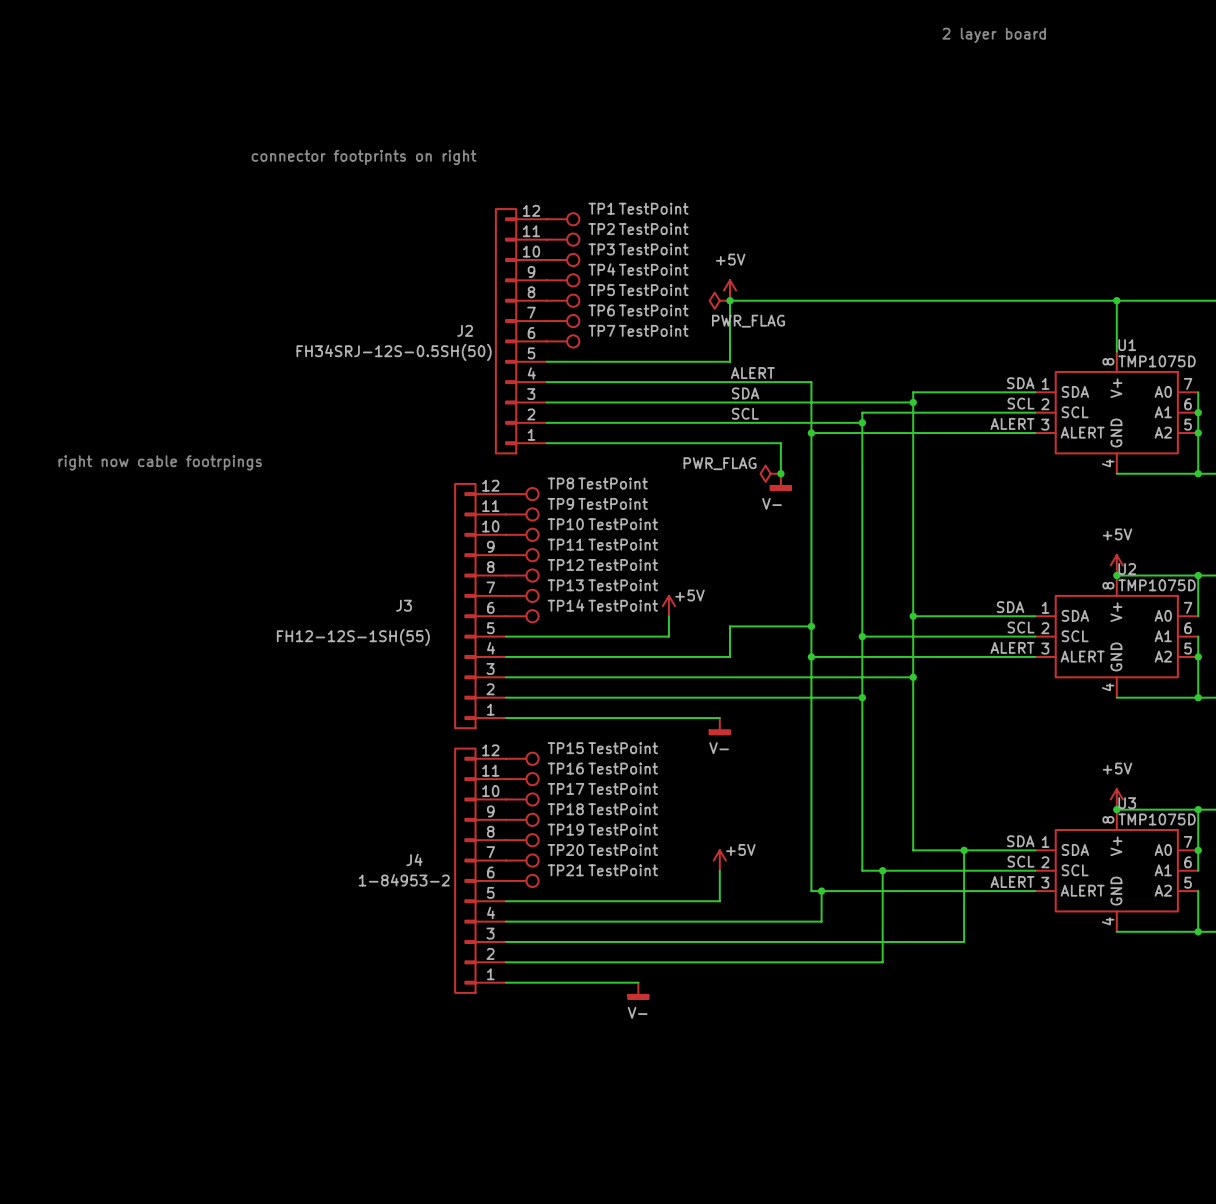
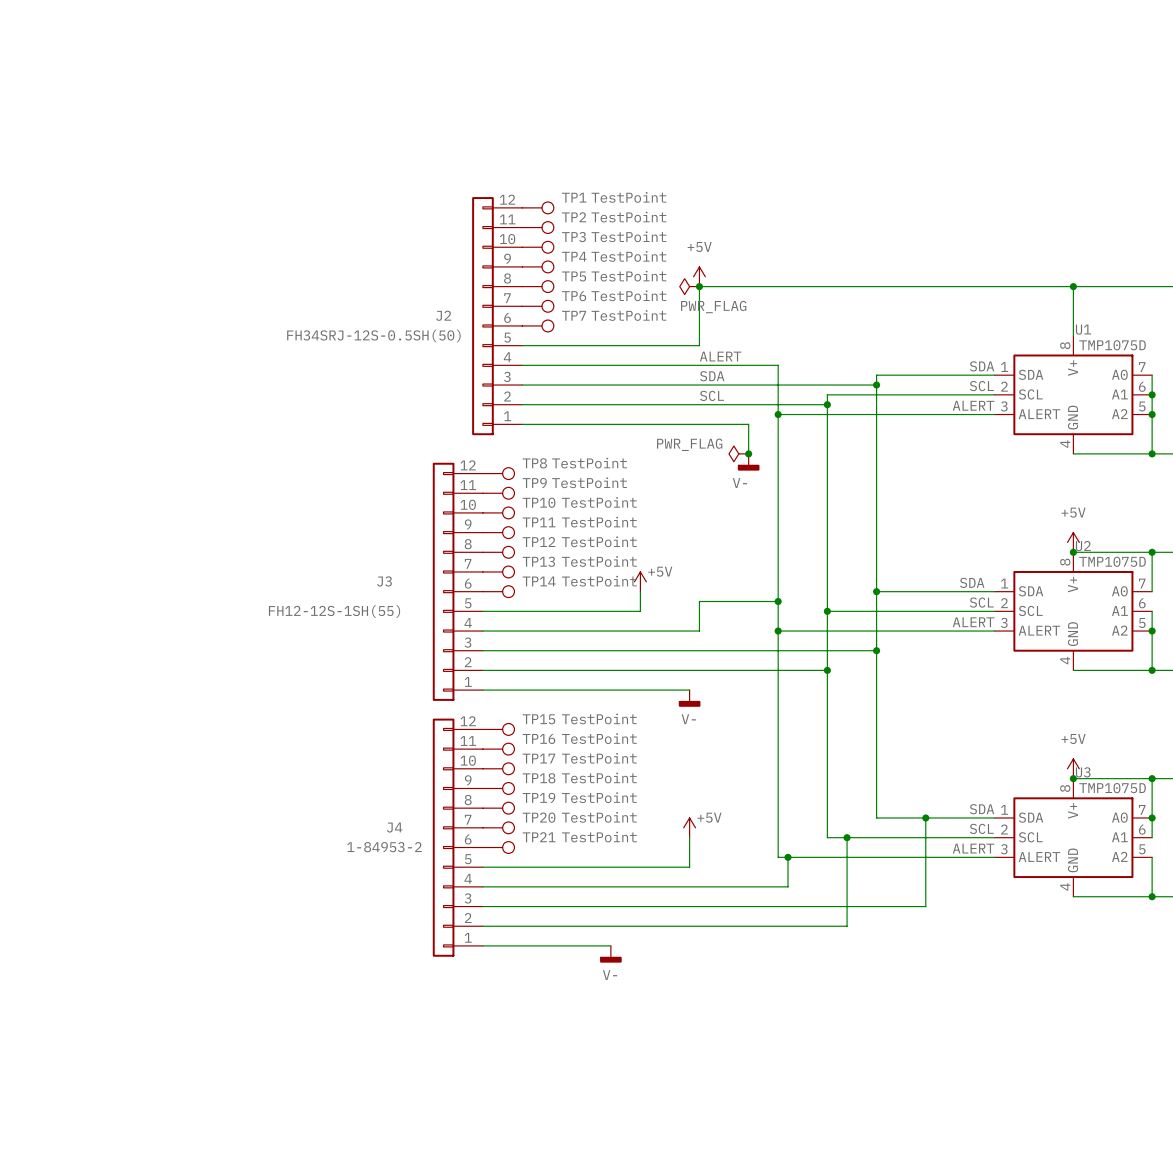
text: 2 layer board (994, 35) -> none
text: connector footprints on right (364, 157) -> none
text: right now cable footrpings (160, 462) -> none

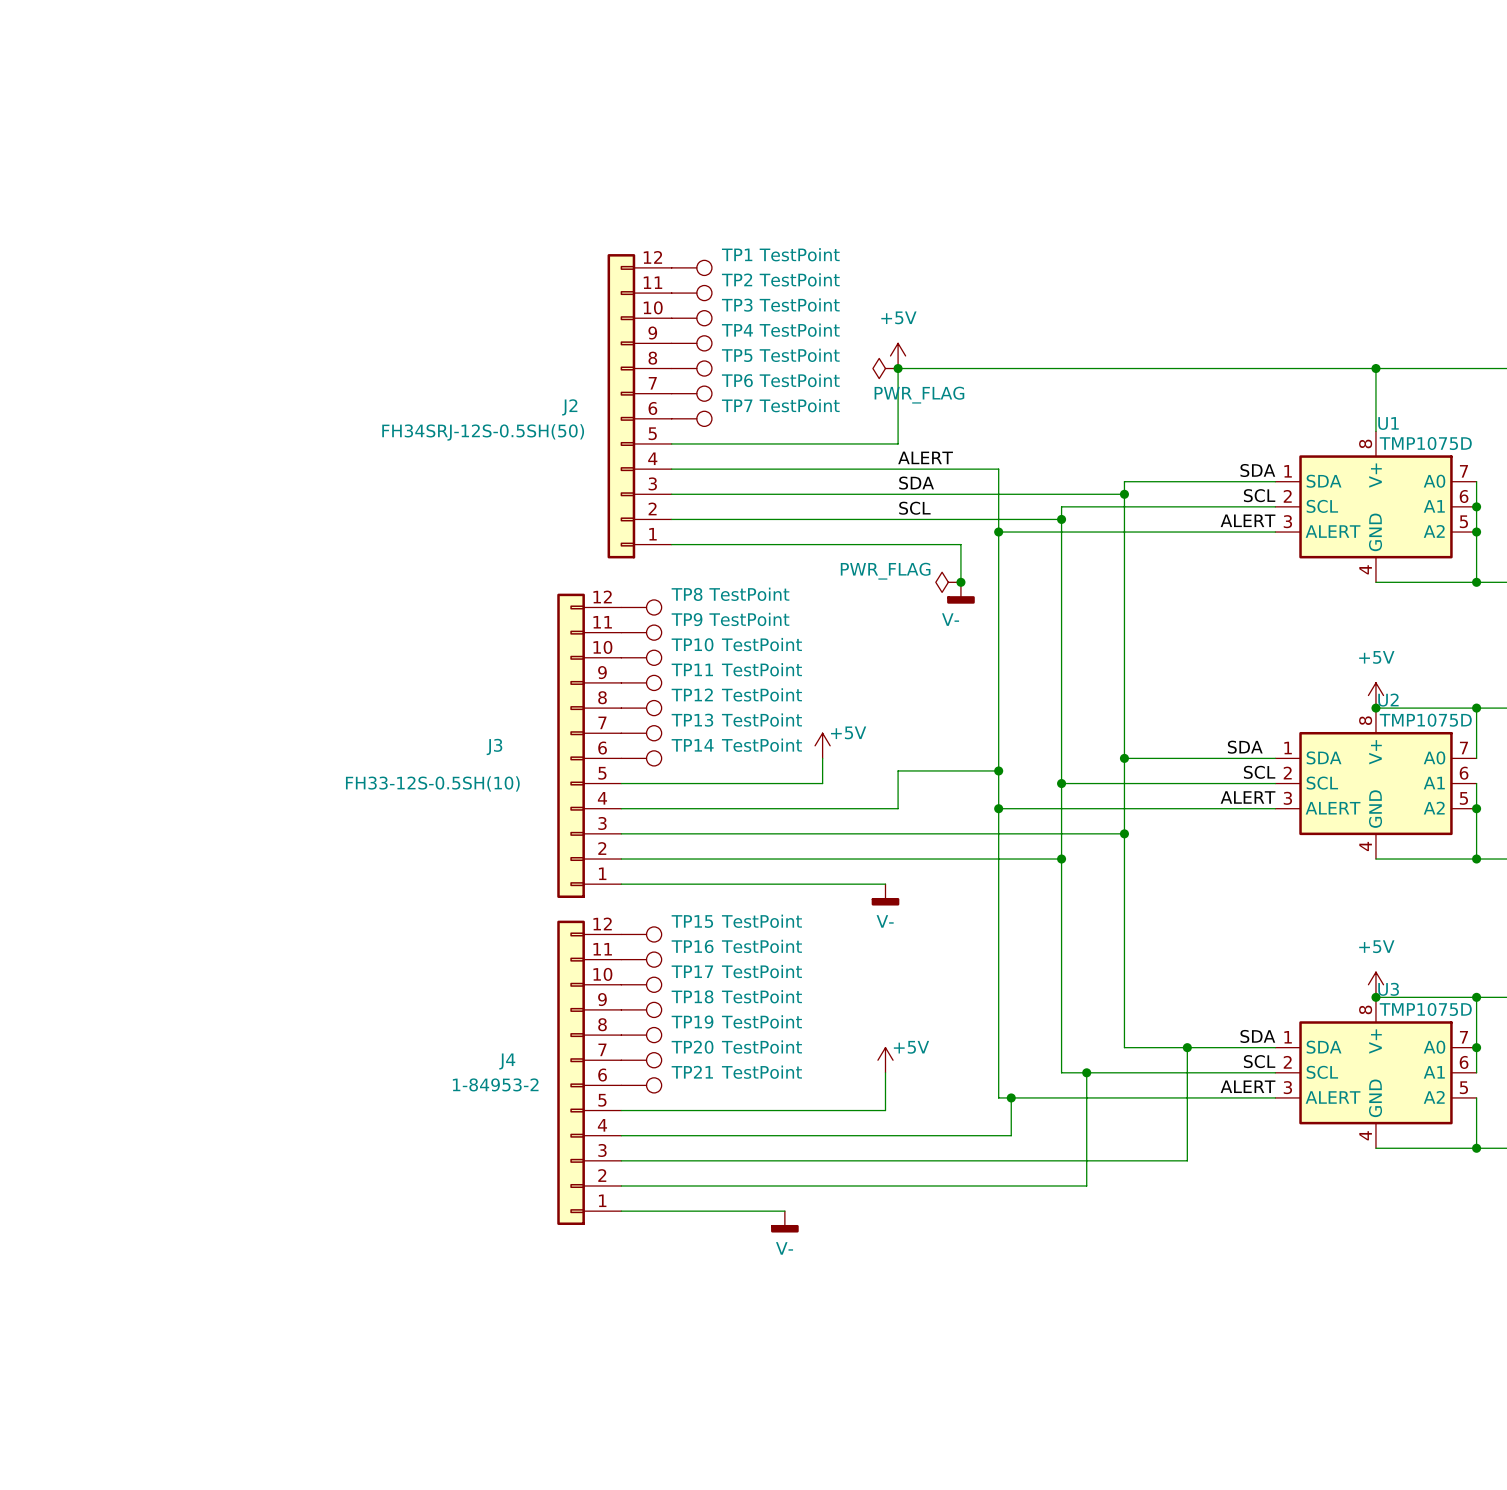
J3 value: FH12-12S-1SH(55) (334, 611) -> FH33-12S-0.5SH(10) (432, 783)

